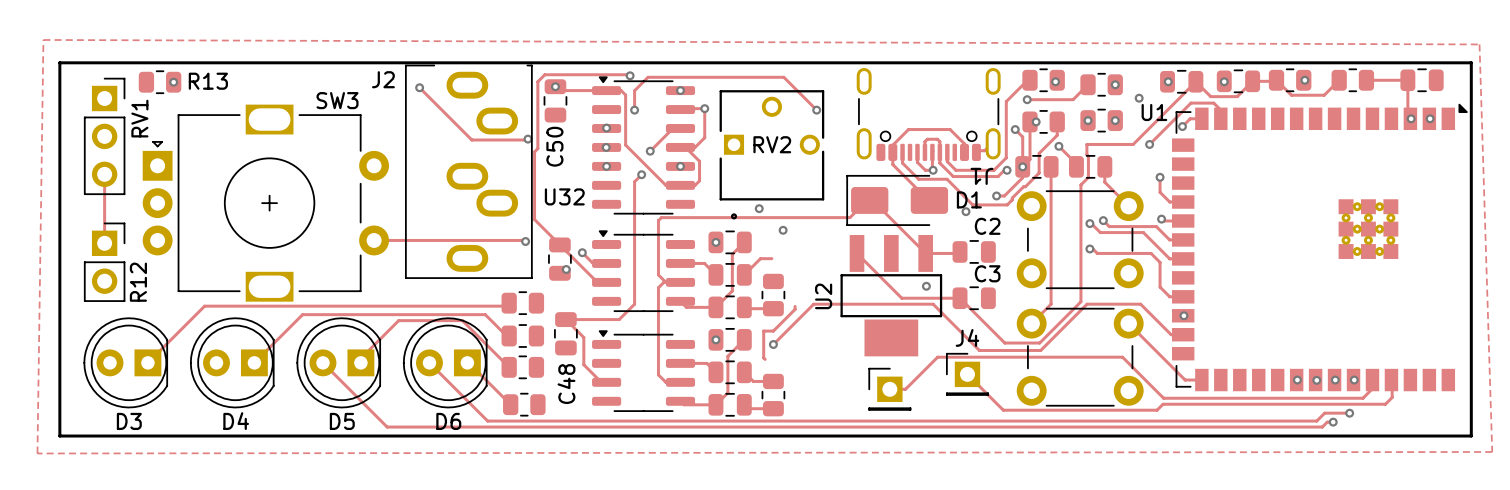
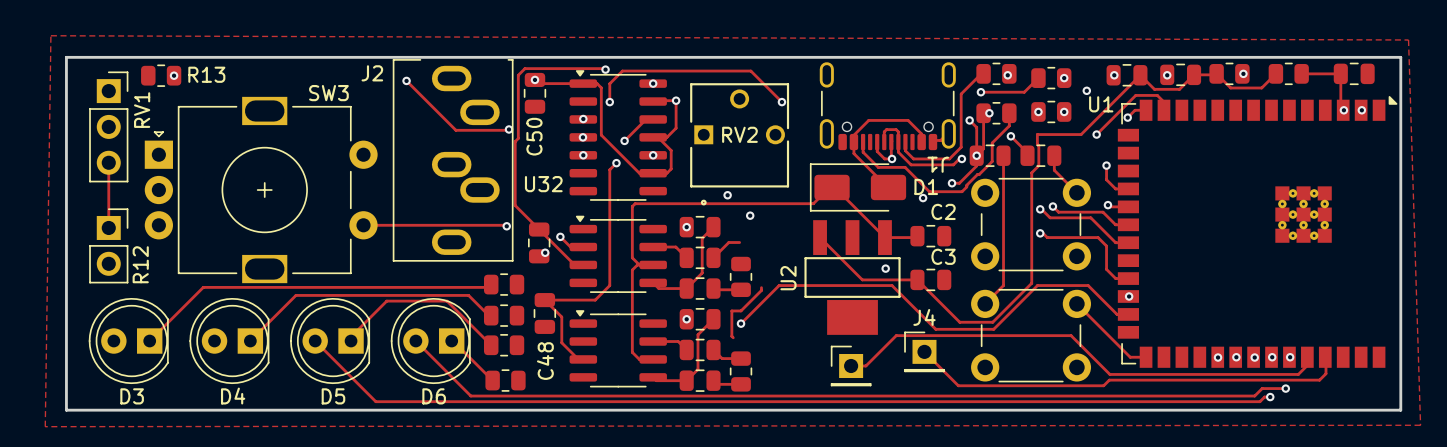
via: none -> (1218, 357)

